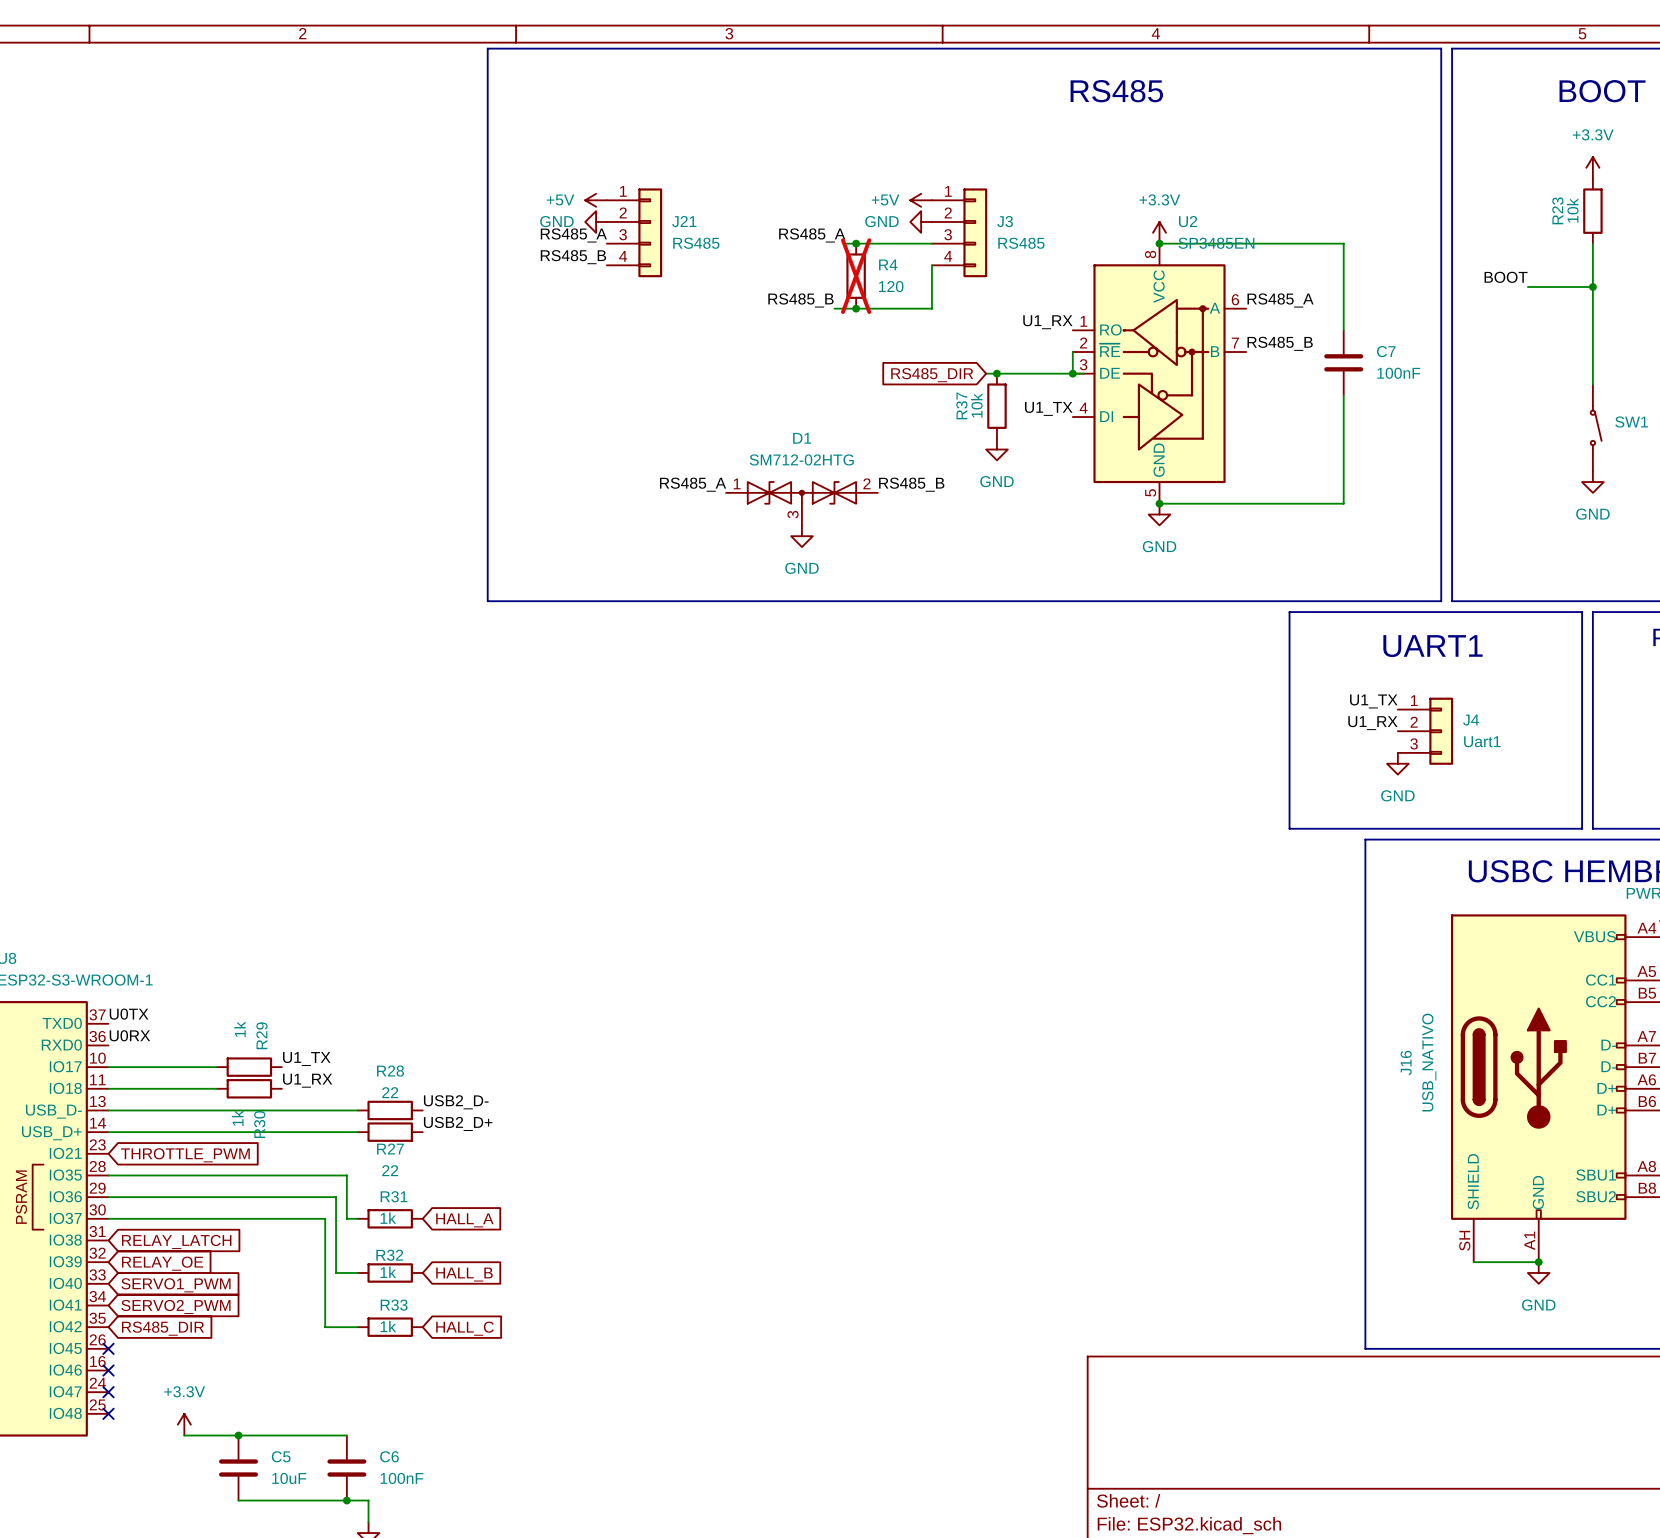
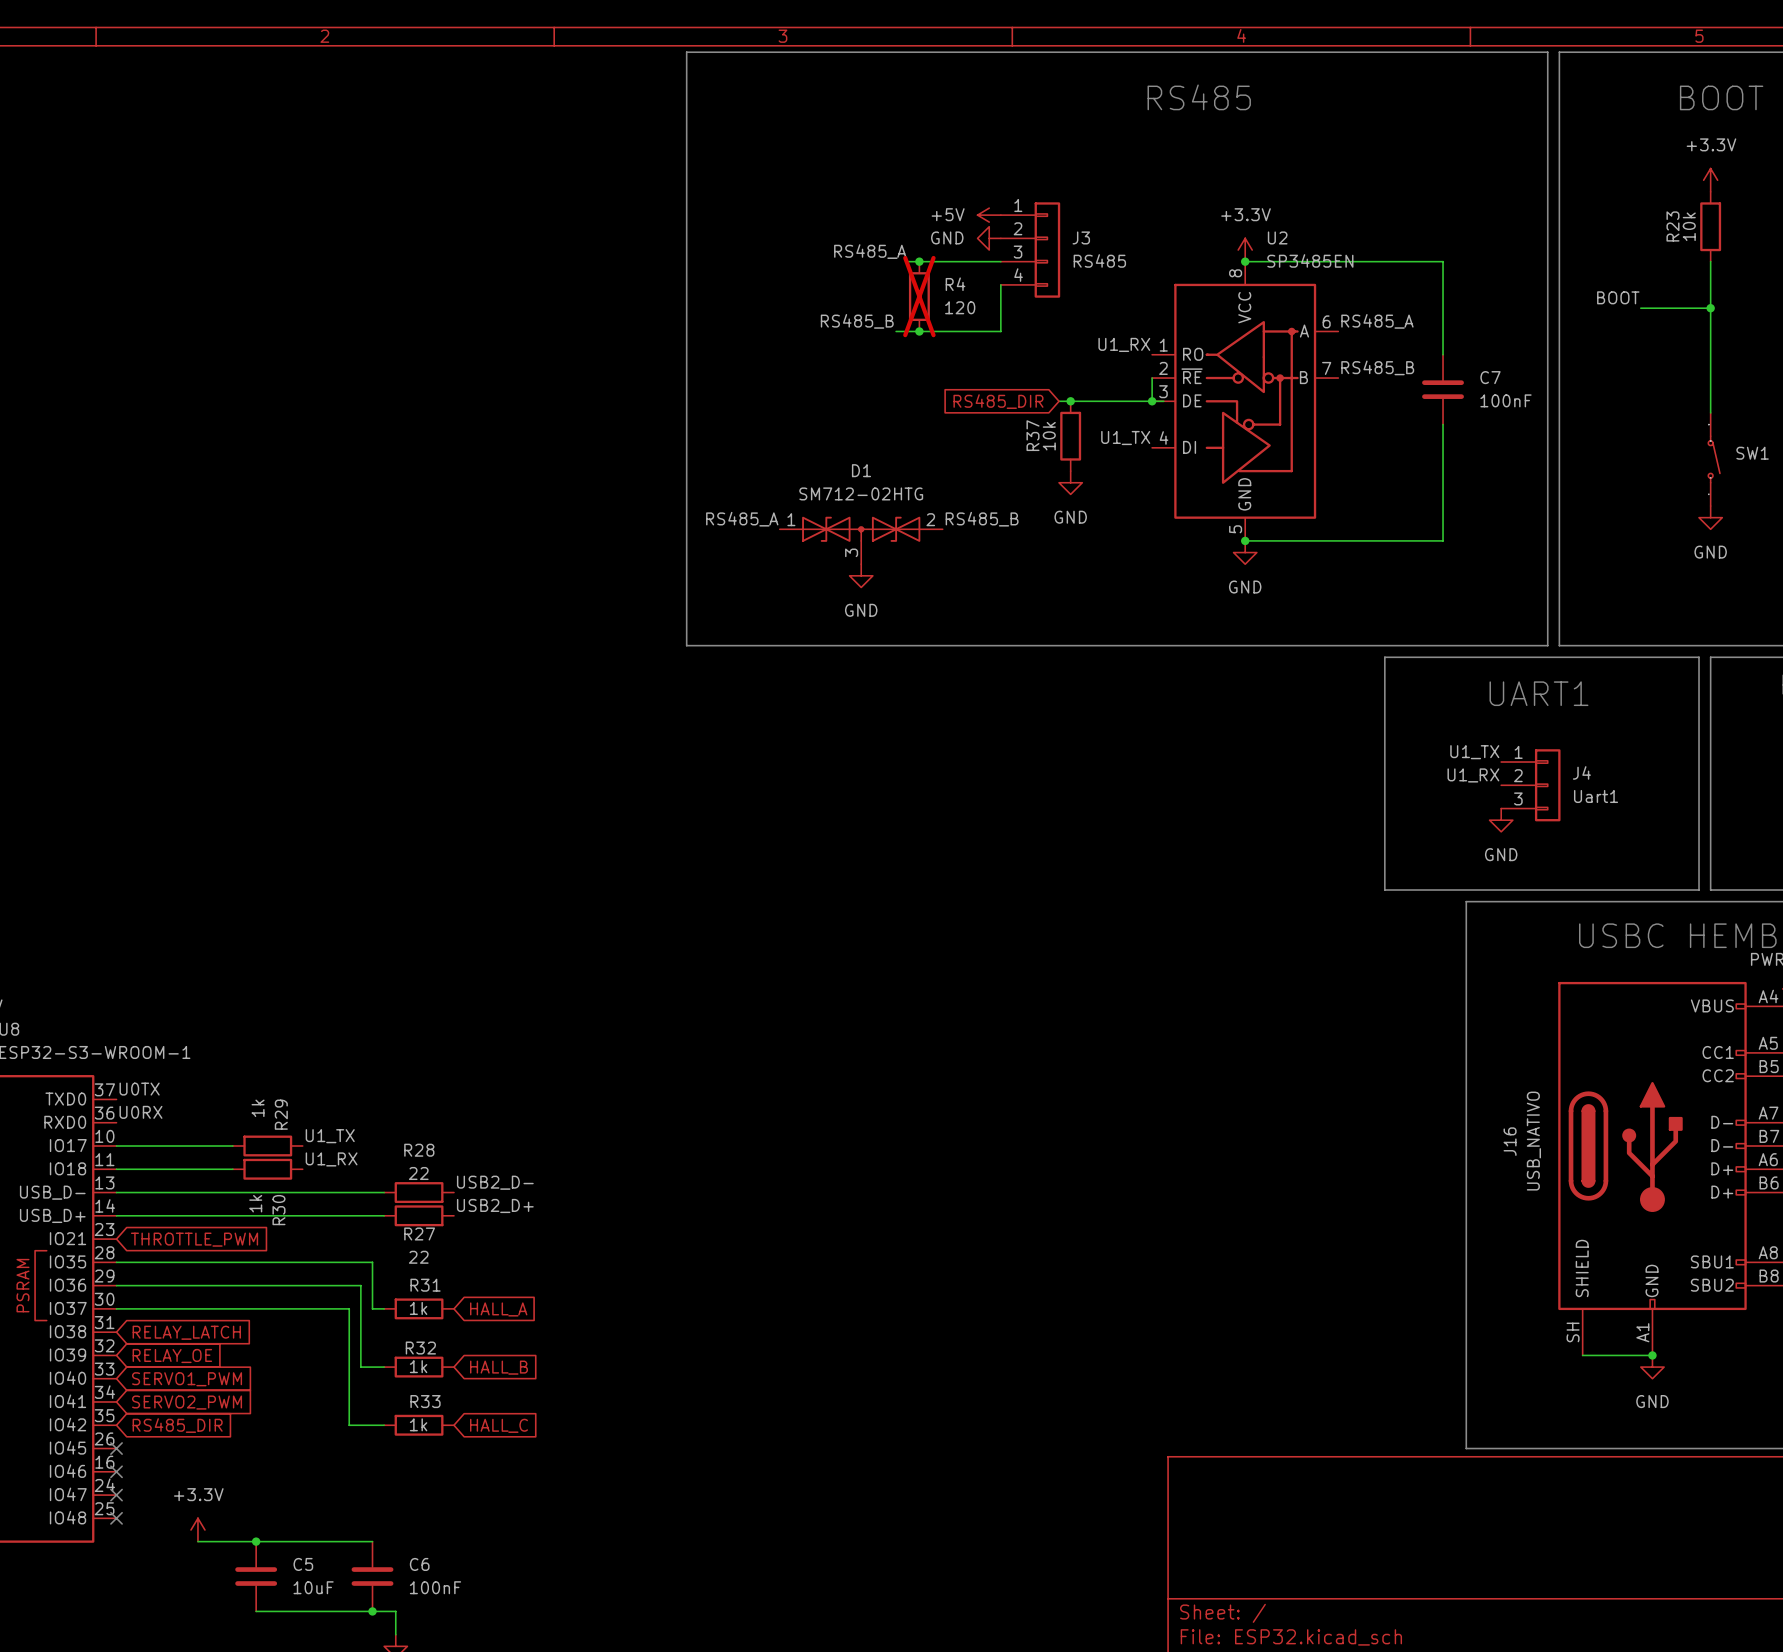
line: (639, 48) (487, 48) (487, 601) (639, 601) -> (686, 52) (686, 645)
power symbol: +5V (596, 200) -> none
power symbol: GND (596, 221) -> none
J21: RS485 (634, 232) -> none
label: RS485_A (573, 235) -> none
label: RS485_B (573, 257) -> none

